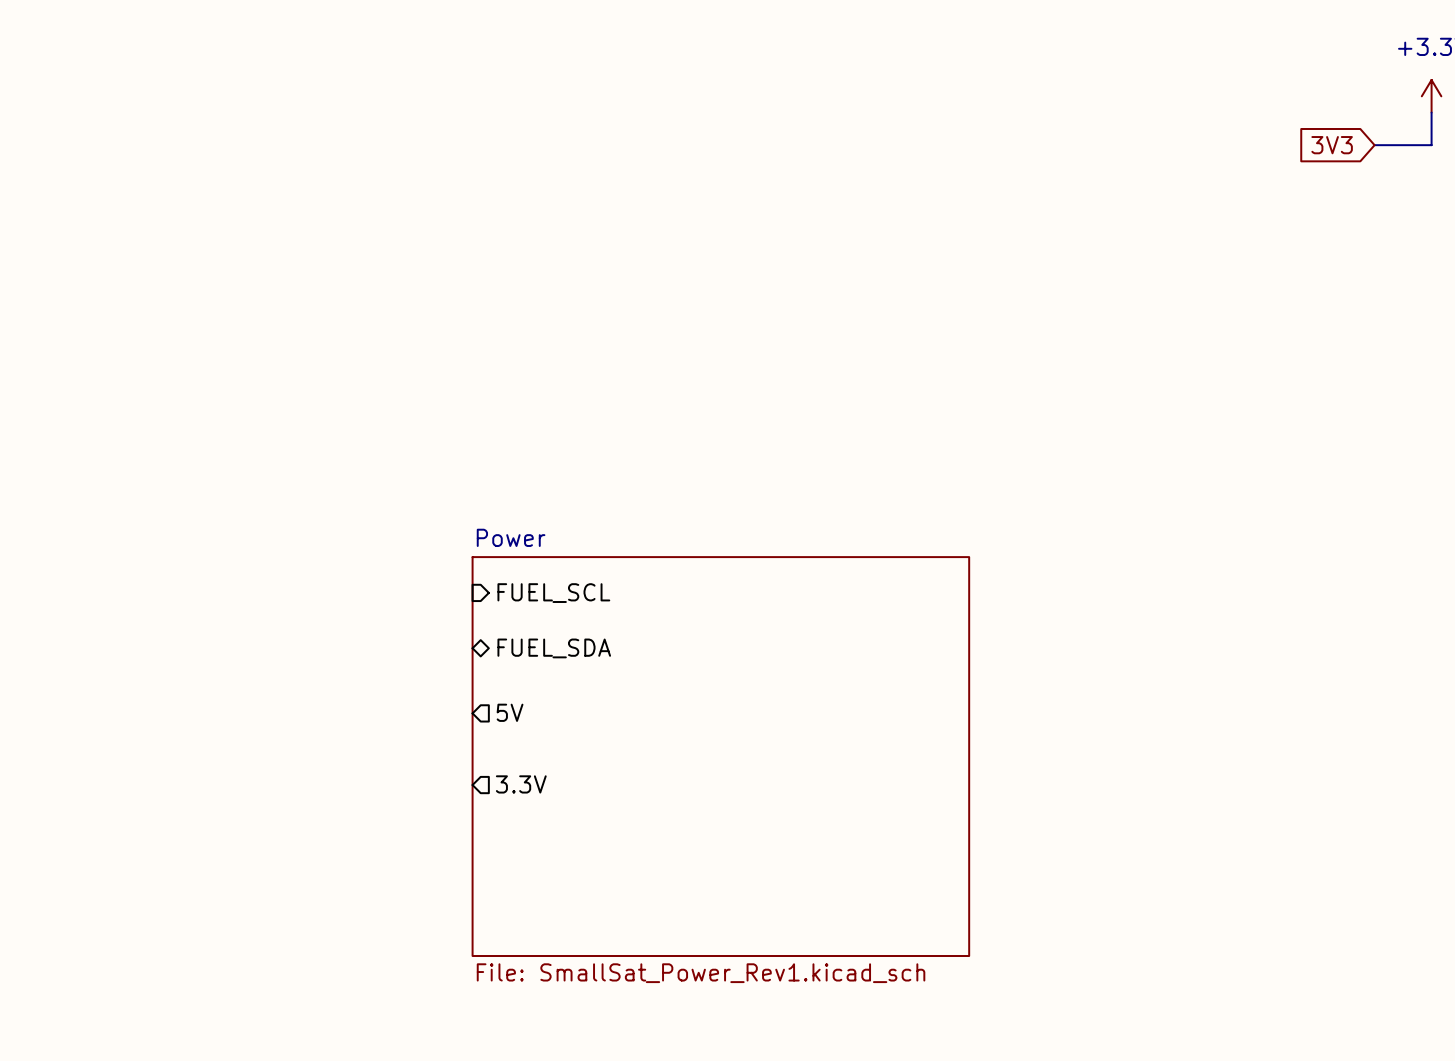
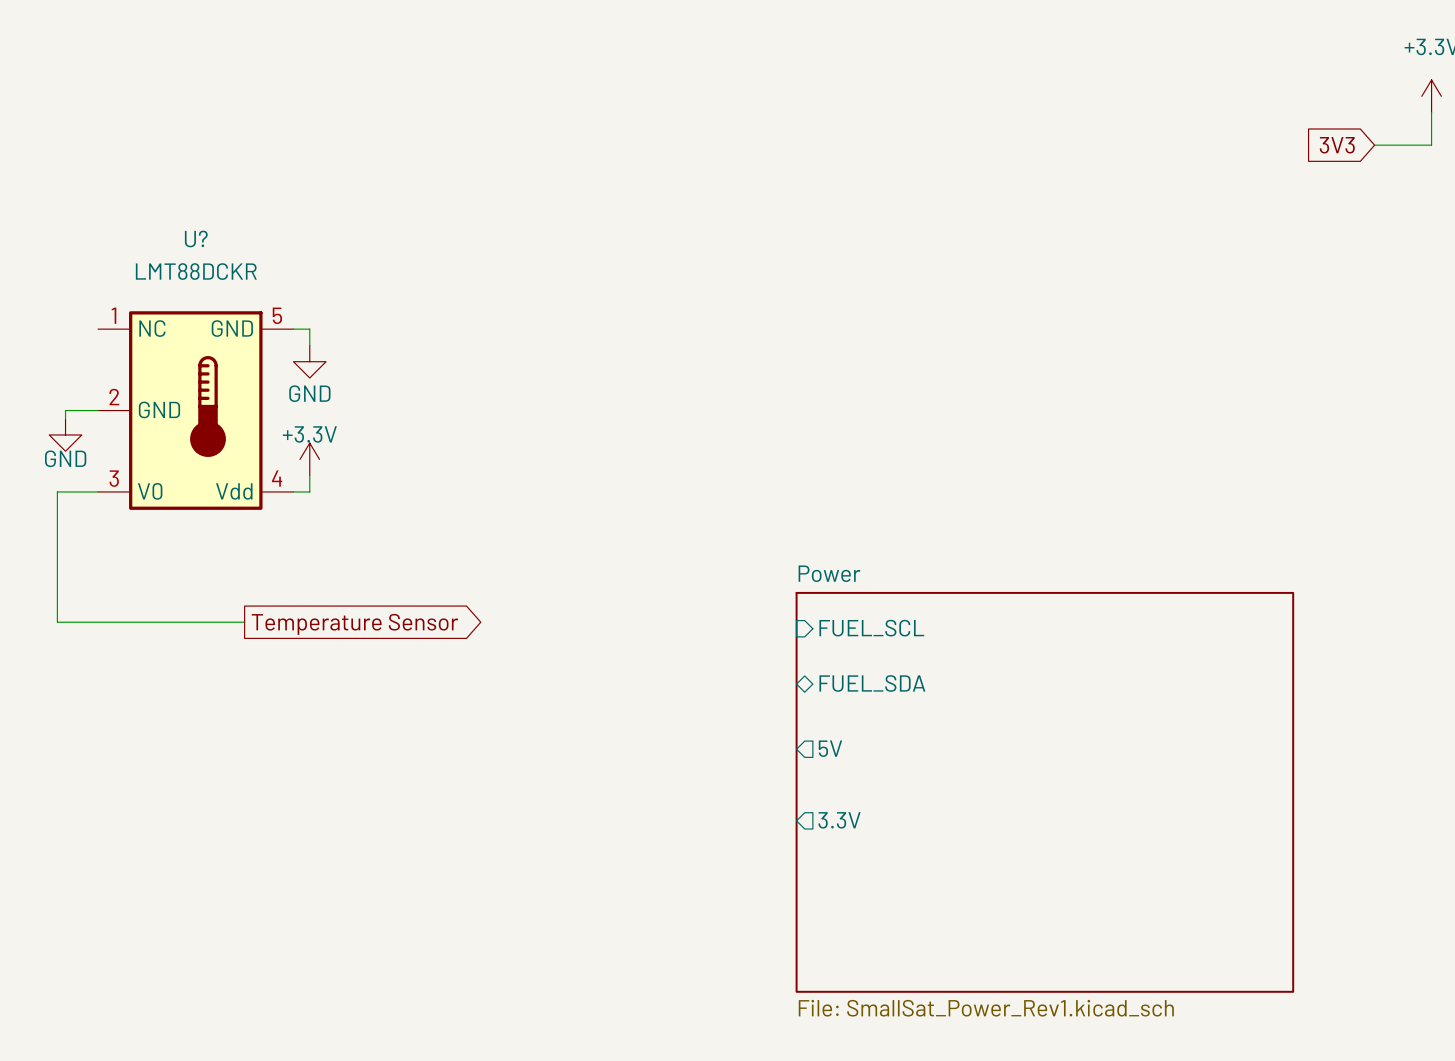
wire: none -> (293, 329) (309, 329) (309, 345)
power symbol: none -> GND (309, 361)
wire: none -> (98, 410) (65, 410) (65, 418)
U?: none -> LMT88DCKR (195, 410)
power symbol: none -> GND (65, 434)
power symbol: none -> +3.3V (309, 459)
wire: none -> (309, 475) (309, 491) (293, 491)
wire: none -> (98, 491) (57, 491) (57, 622) (244, 622)
sheet pin: FUEL_SCL (553, 593) -> none
global label: none -> Temperature Sensor (354, 624)
sheet pin: none -> FUEL_SCL (871, 628)
sheet pin: FUEL_SDA (554, 648) -> none
sheet pin: none -> FUEL_SDA (872, 683)
sheet pin: 5V (510, 712) -> none
sheet pin: none -> 5V (830, 748)
sheet Power: File: SmallSat_Power_Rev1.kicad_sch (720, 756) -> none
sheet pin: 3.3V (521, 784) -> none
sheet Power: none -> File: SmallSat_Power_Rev1.kicad_sch (1044, 792)
sheet pin: none -> 3.3V (839, 820)

